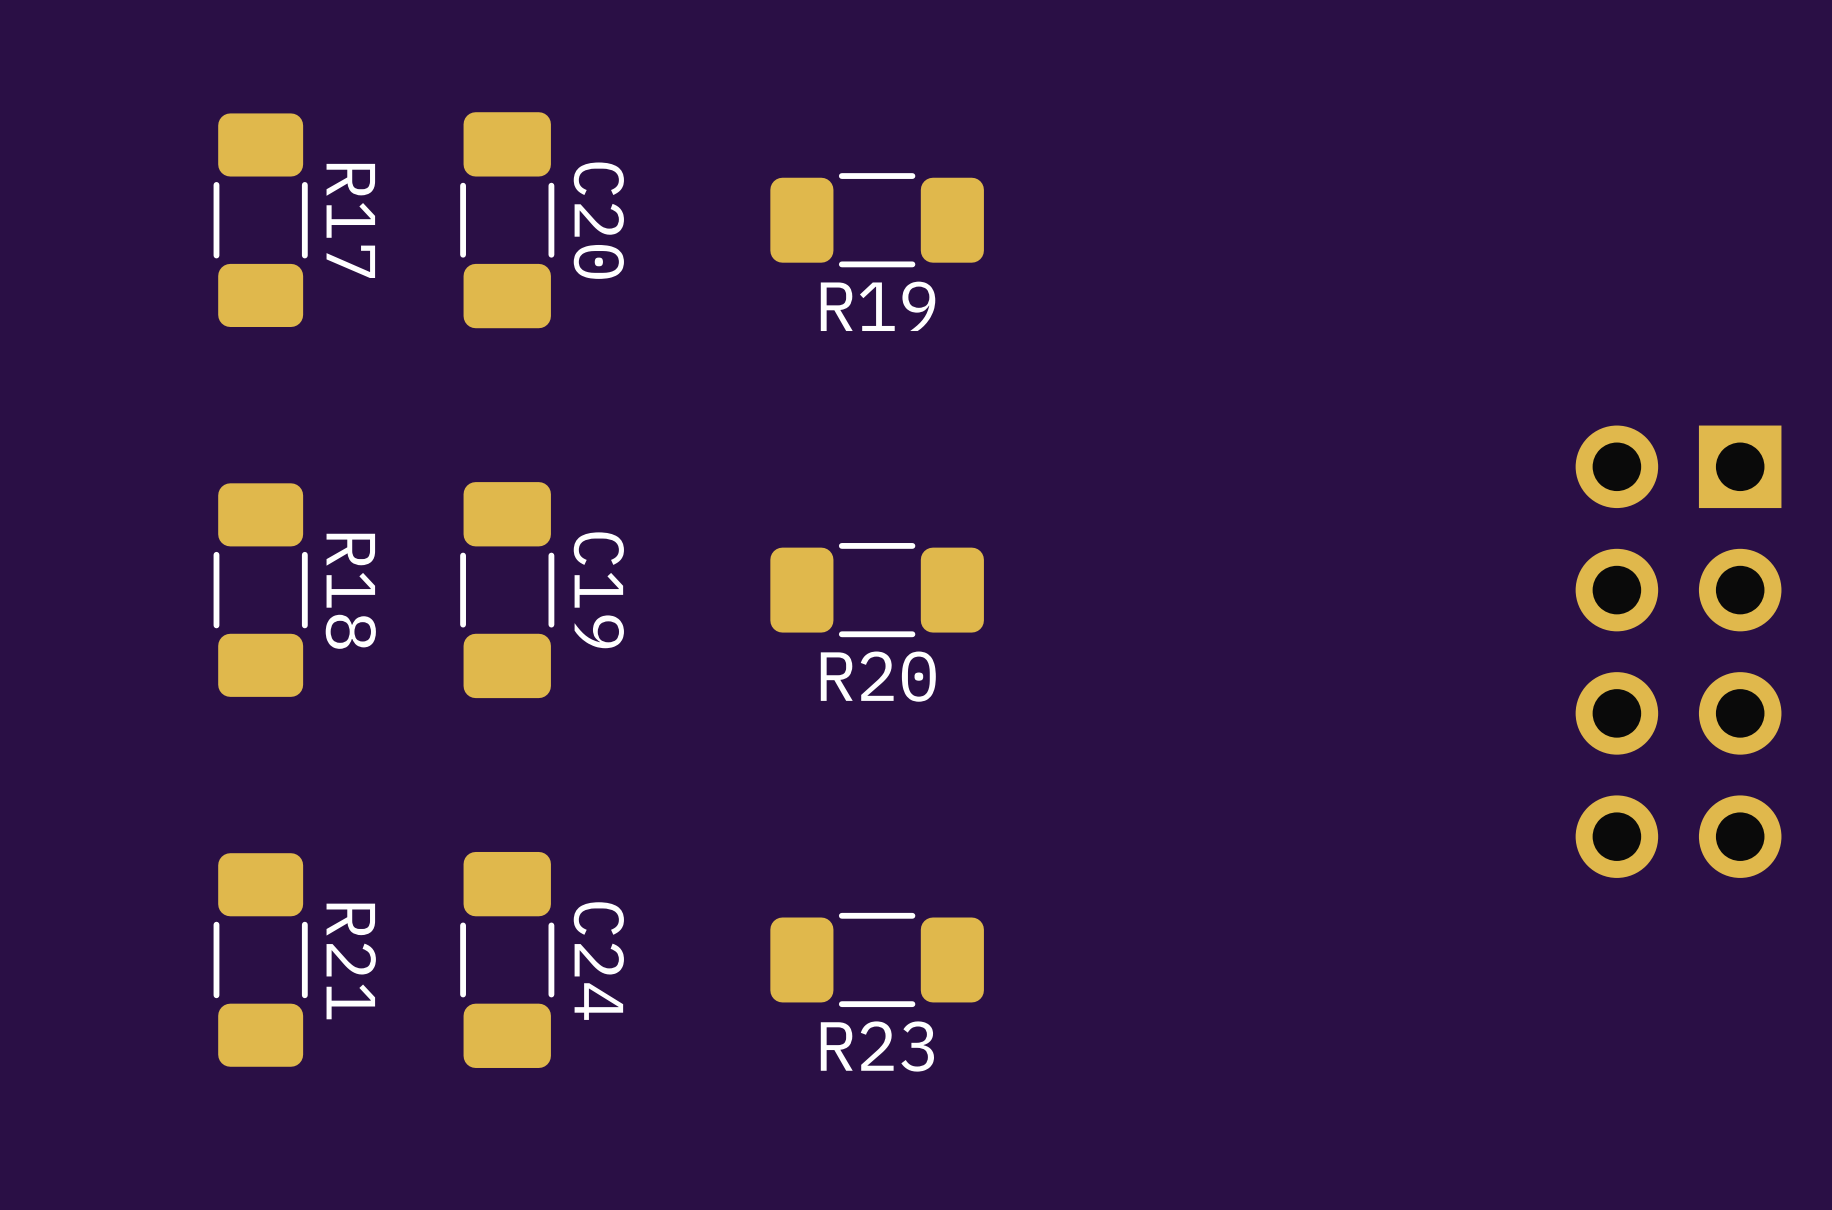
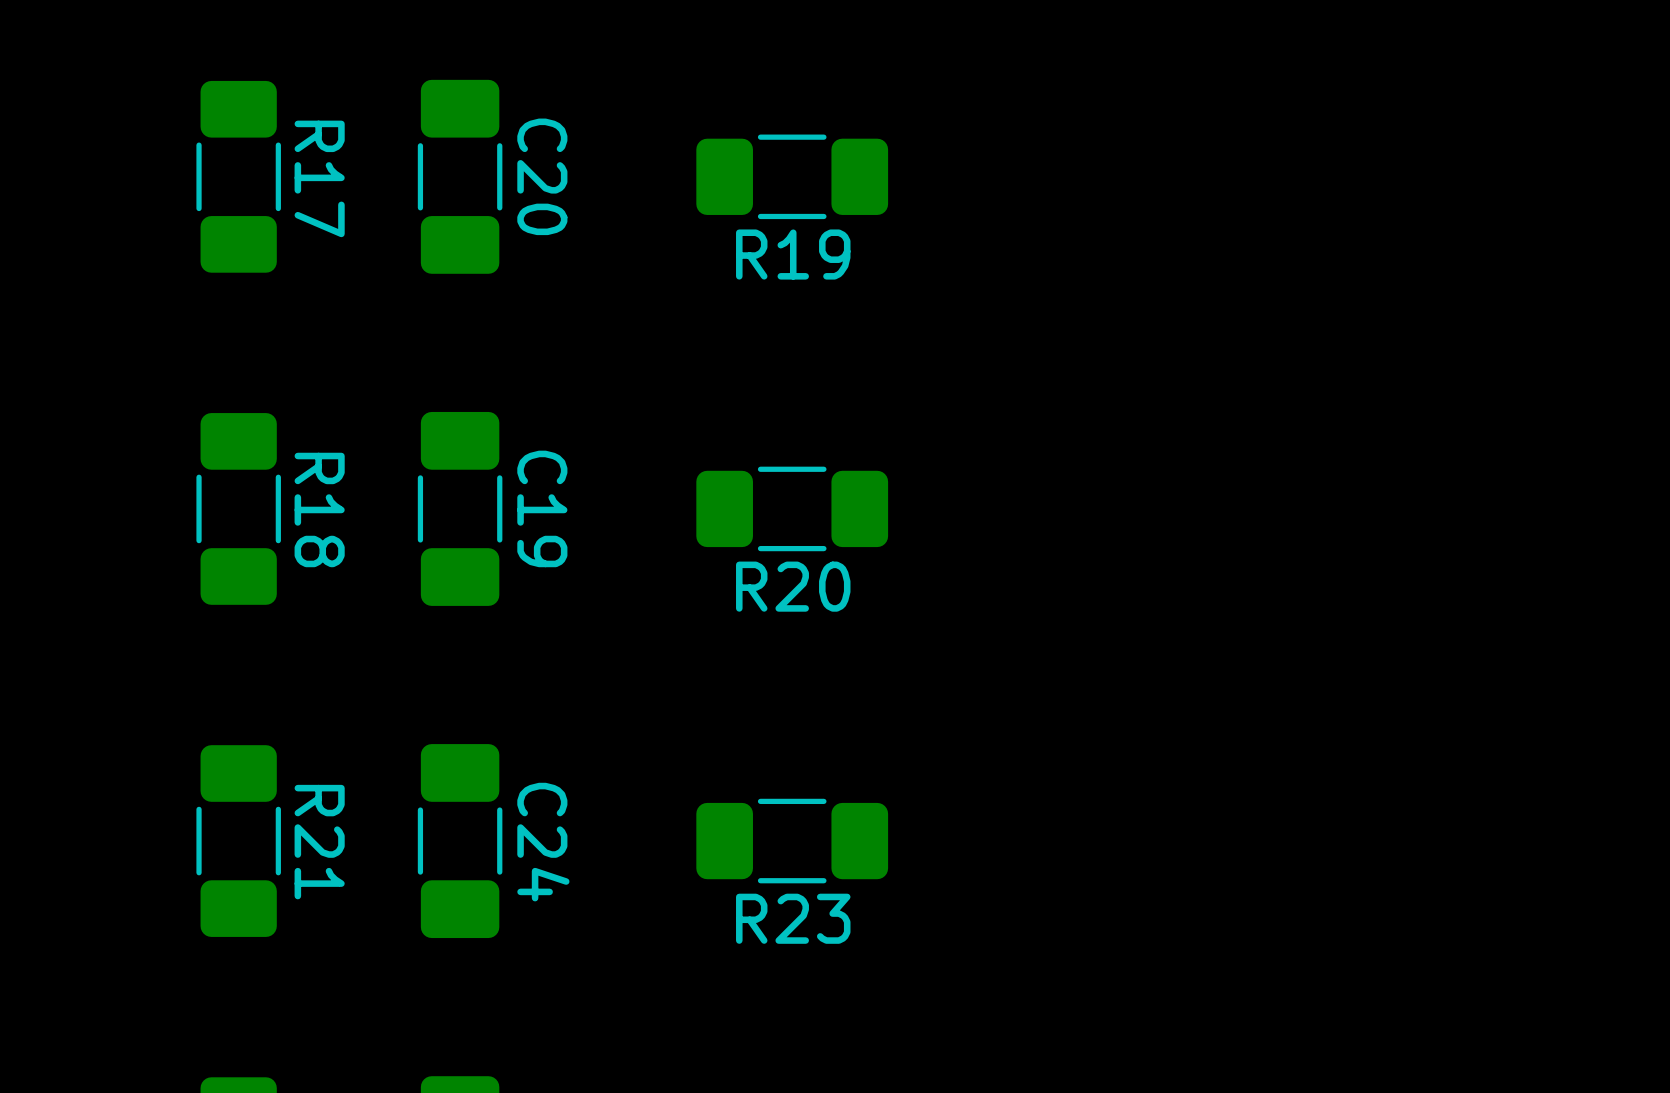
part: (1678, 651) -> none

